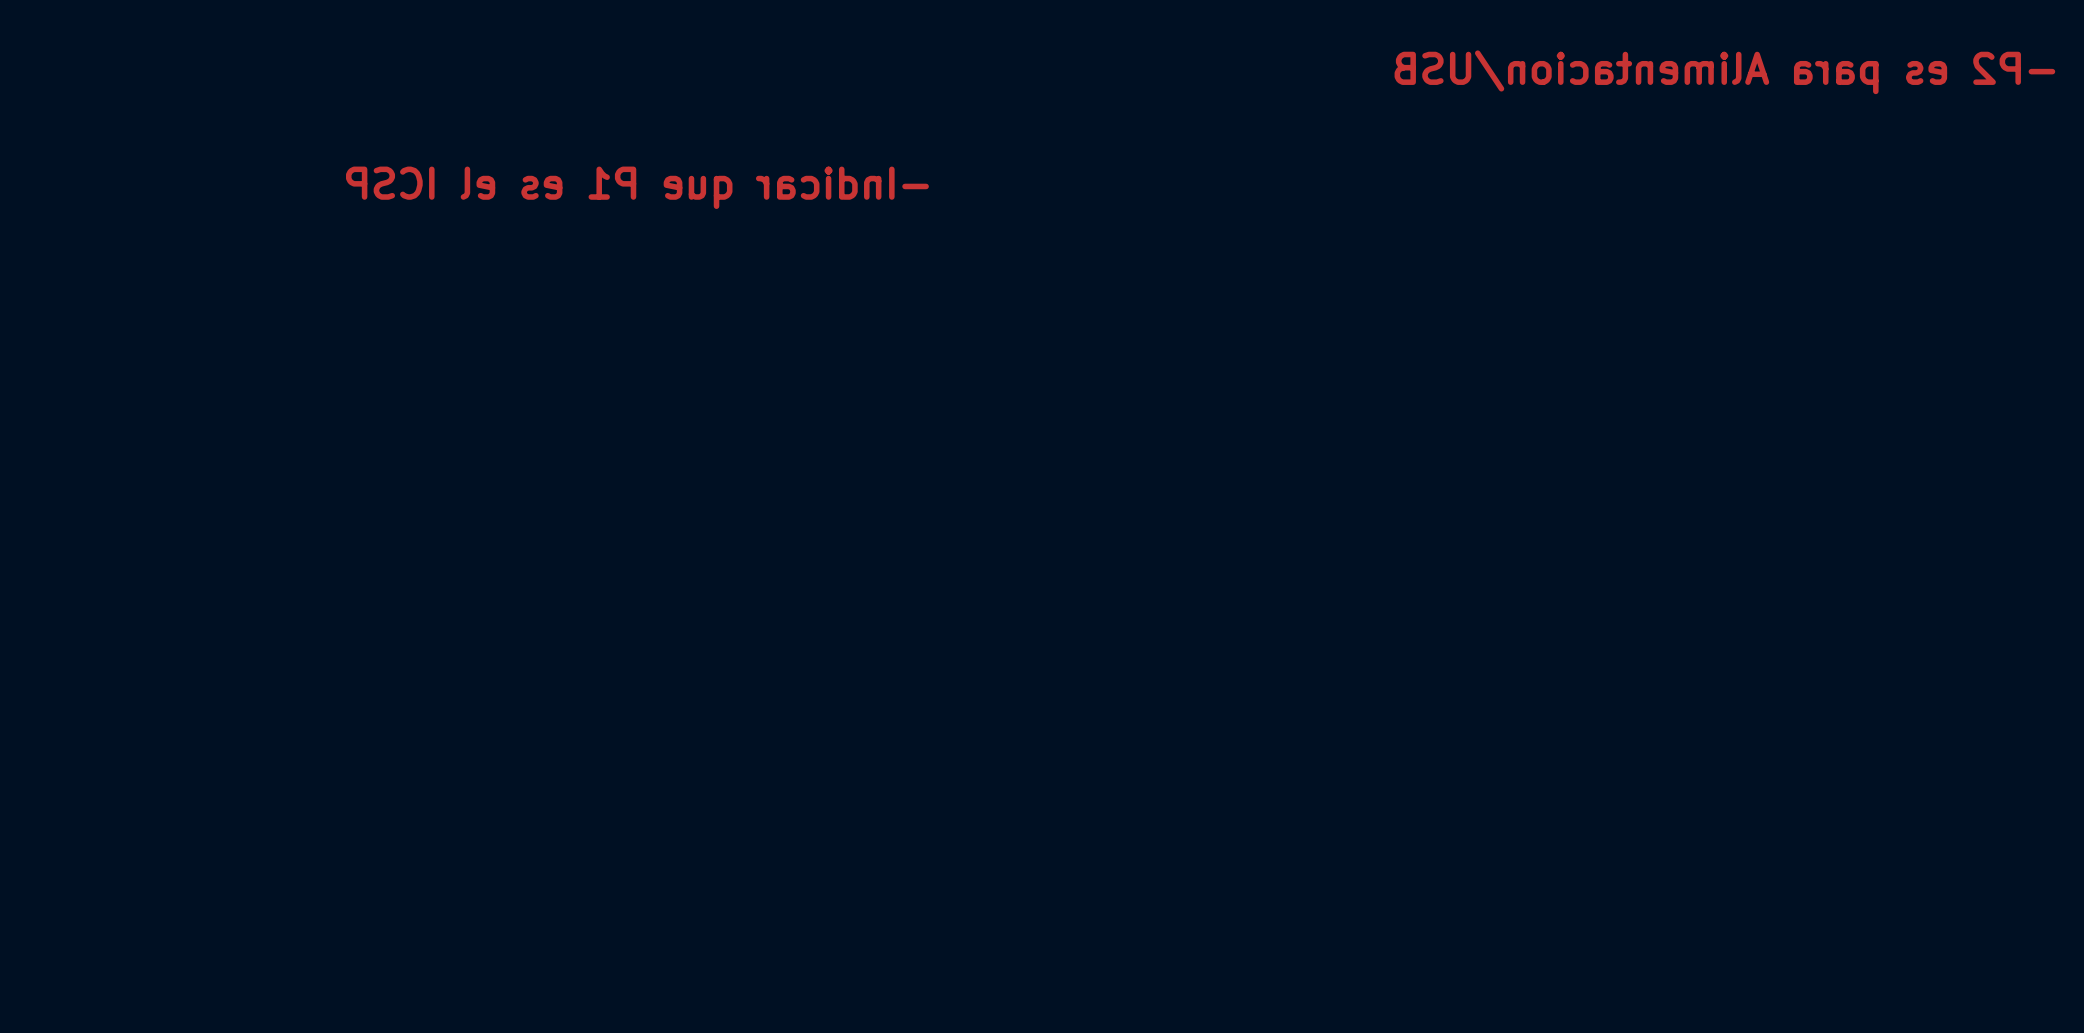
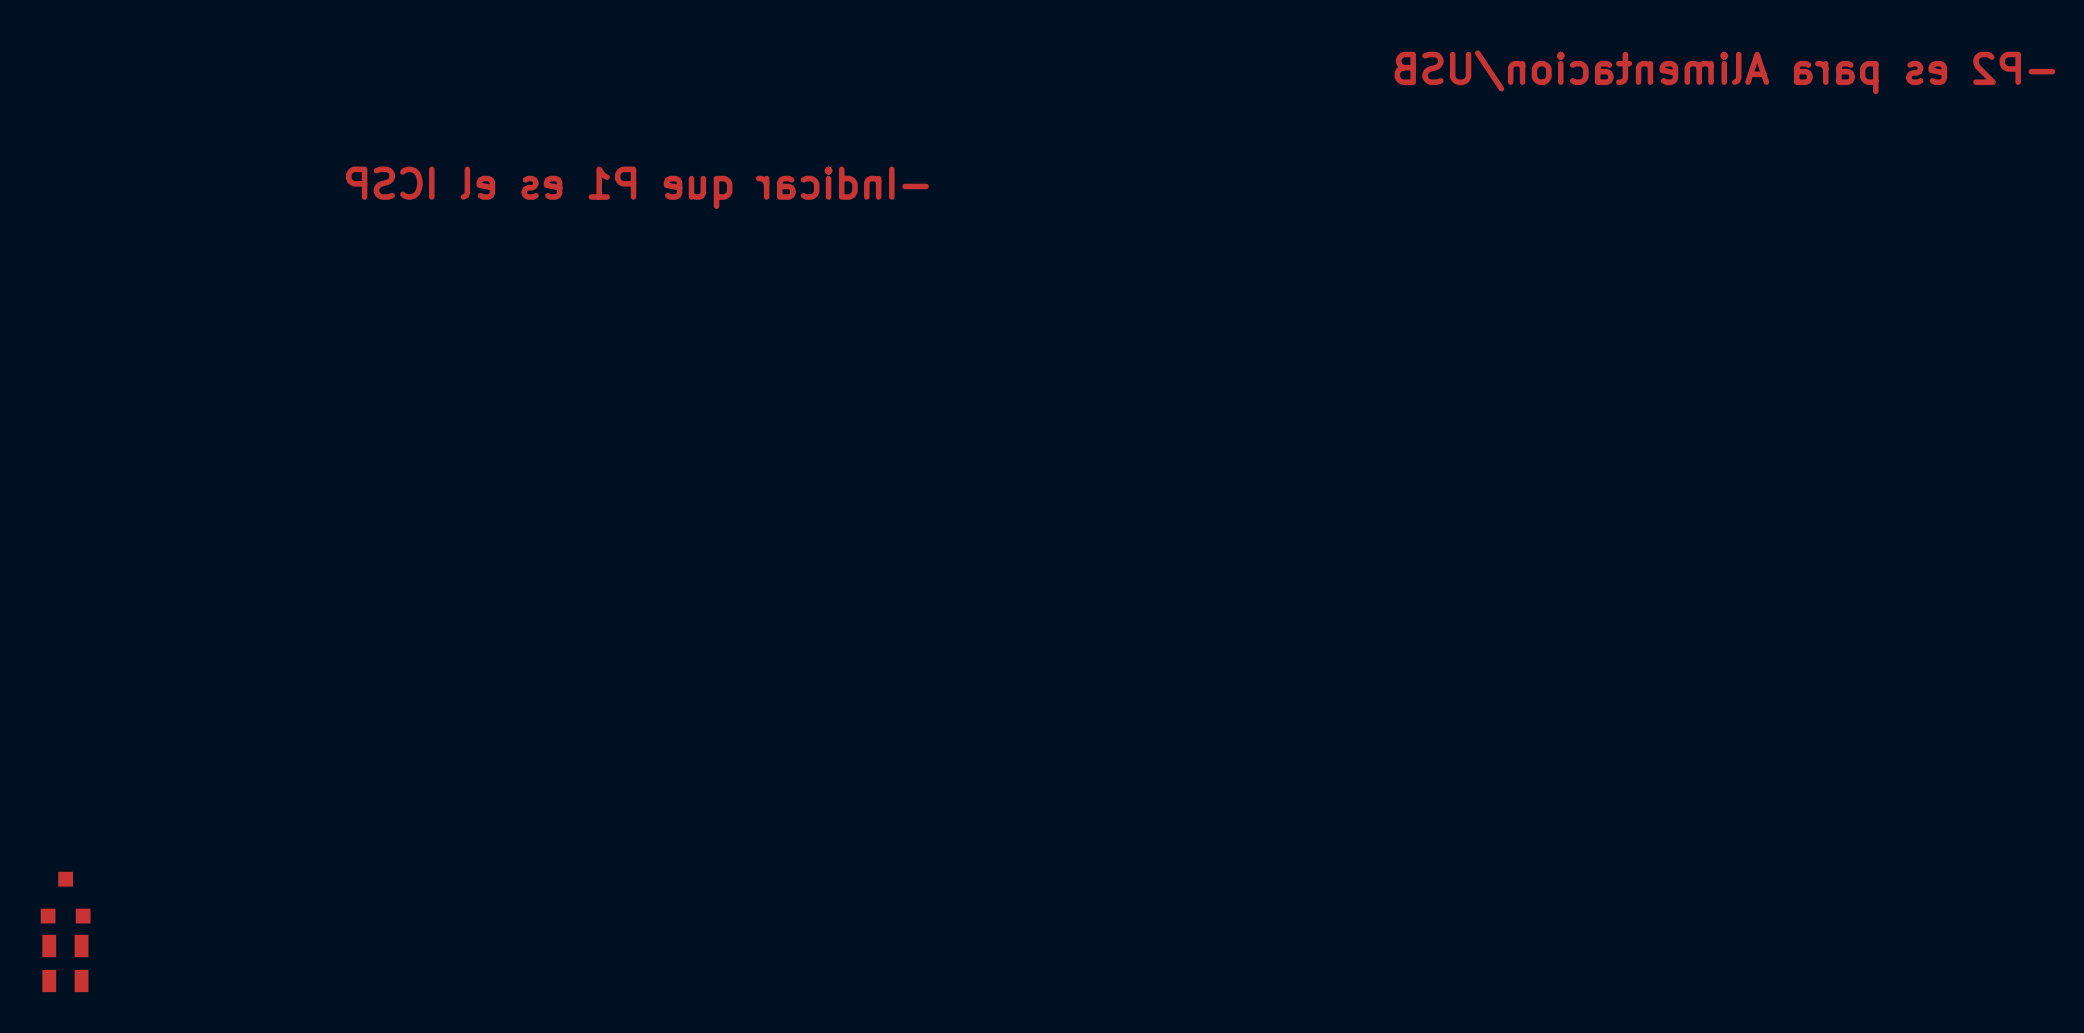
part: none -> (65, 897)
part: none -> (49, 963)
part: none -> (81, 963)

